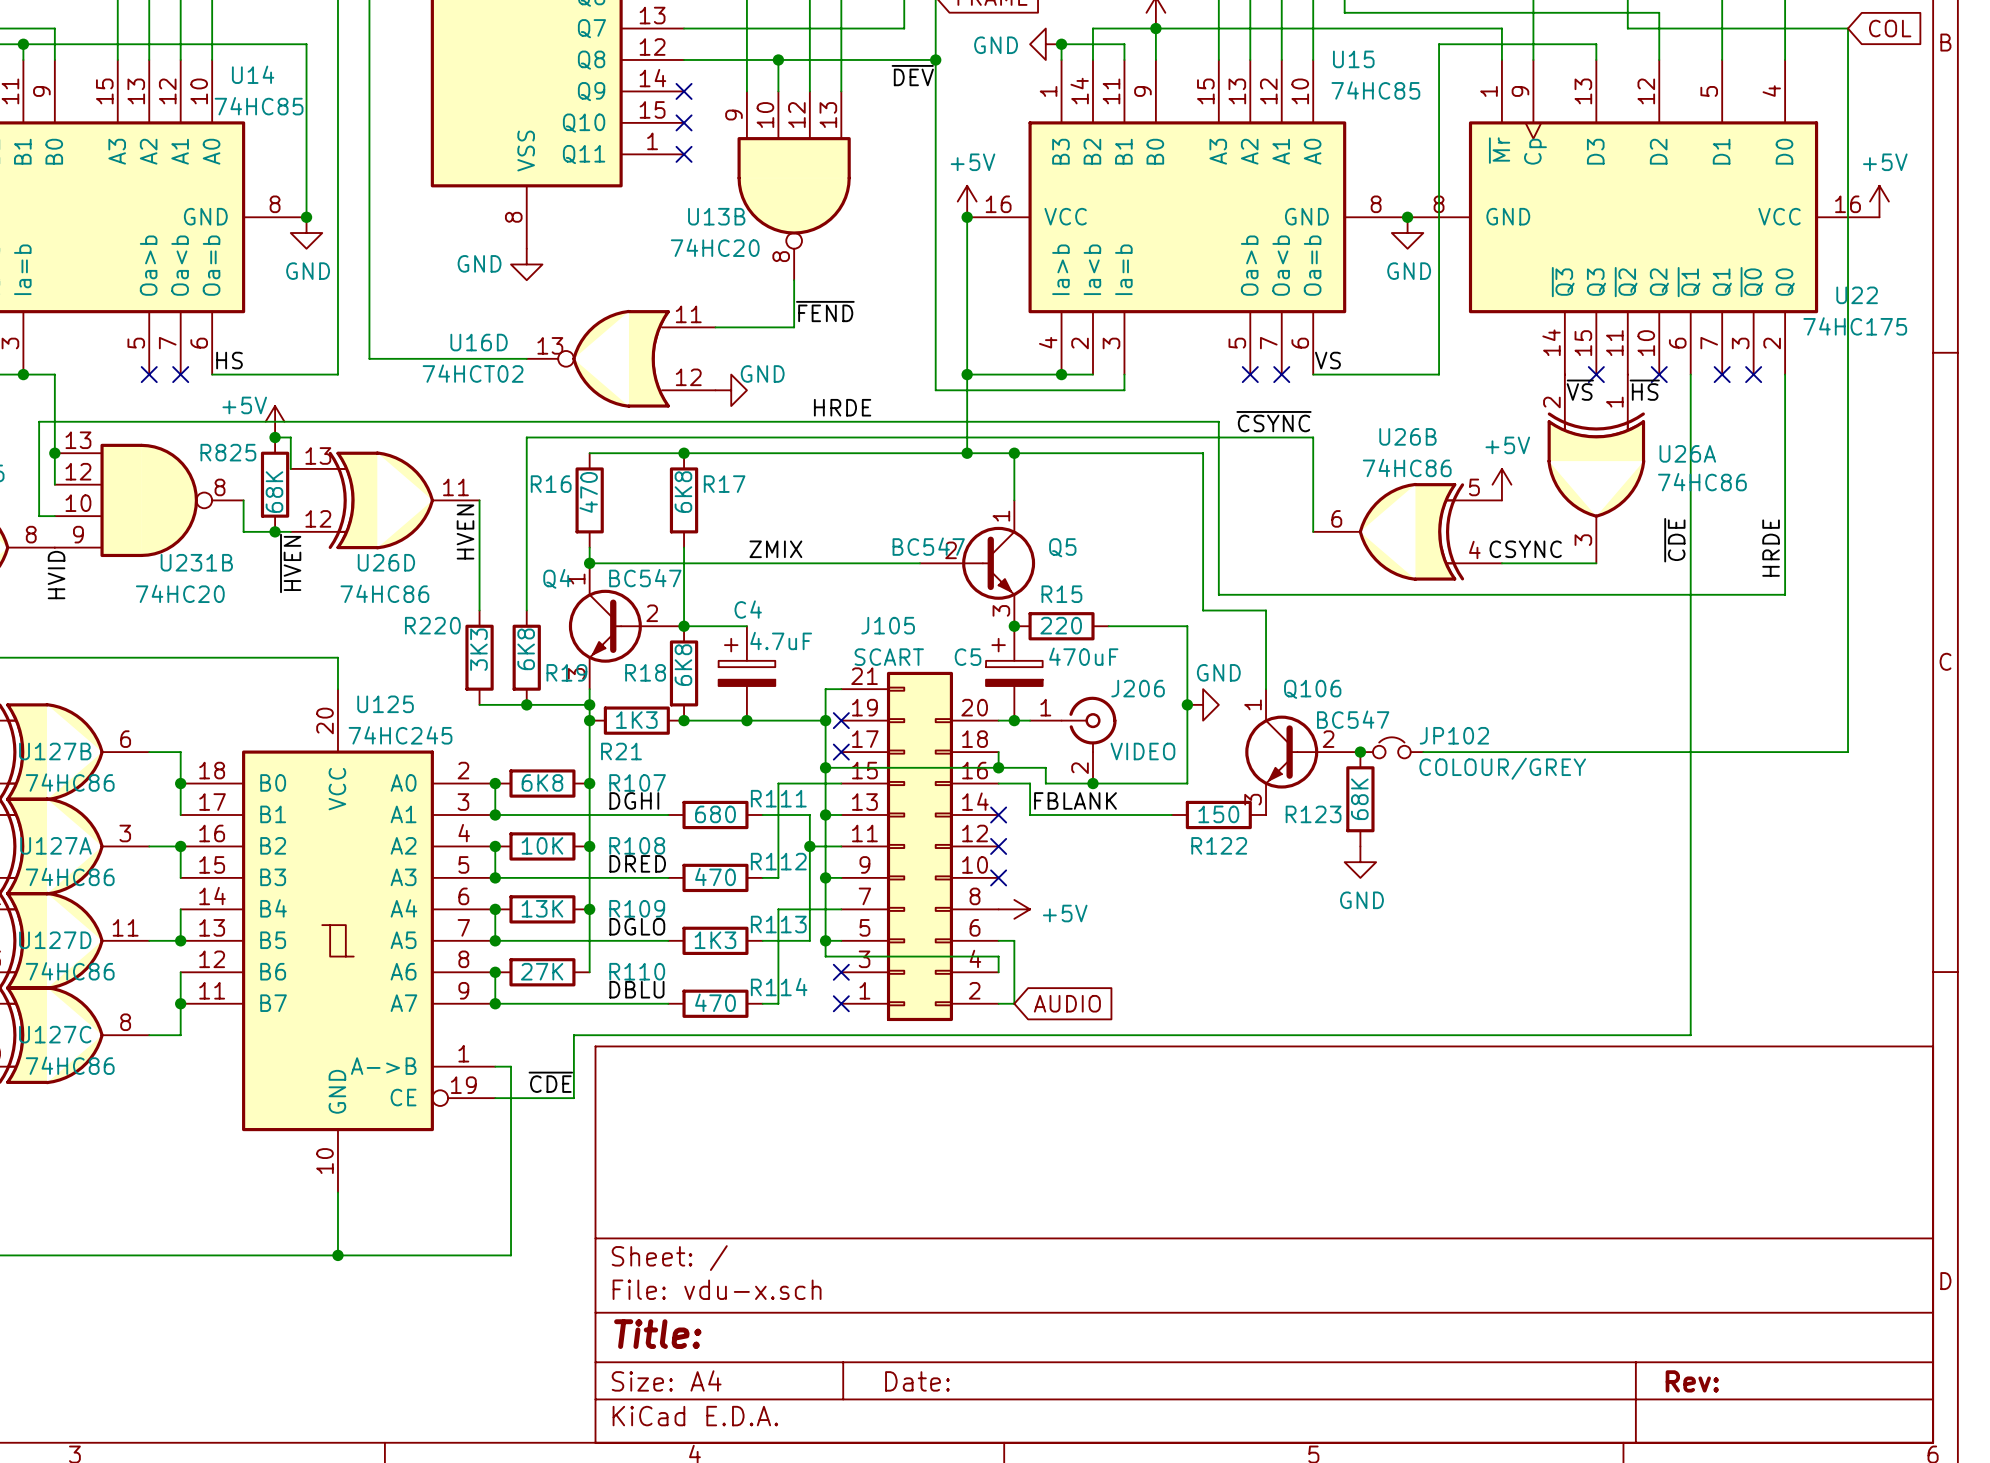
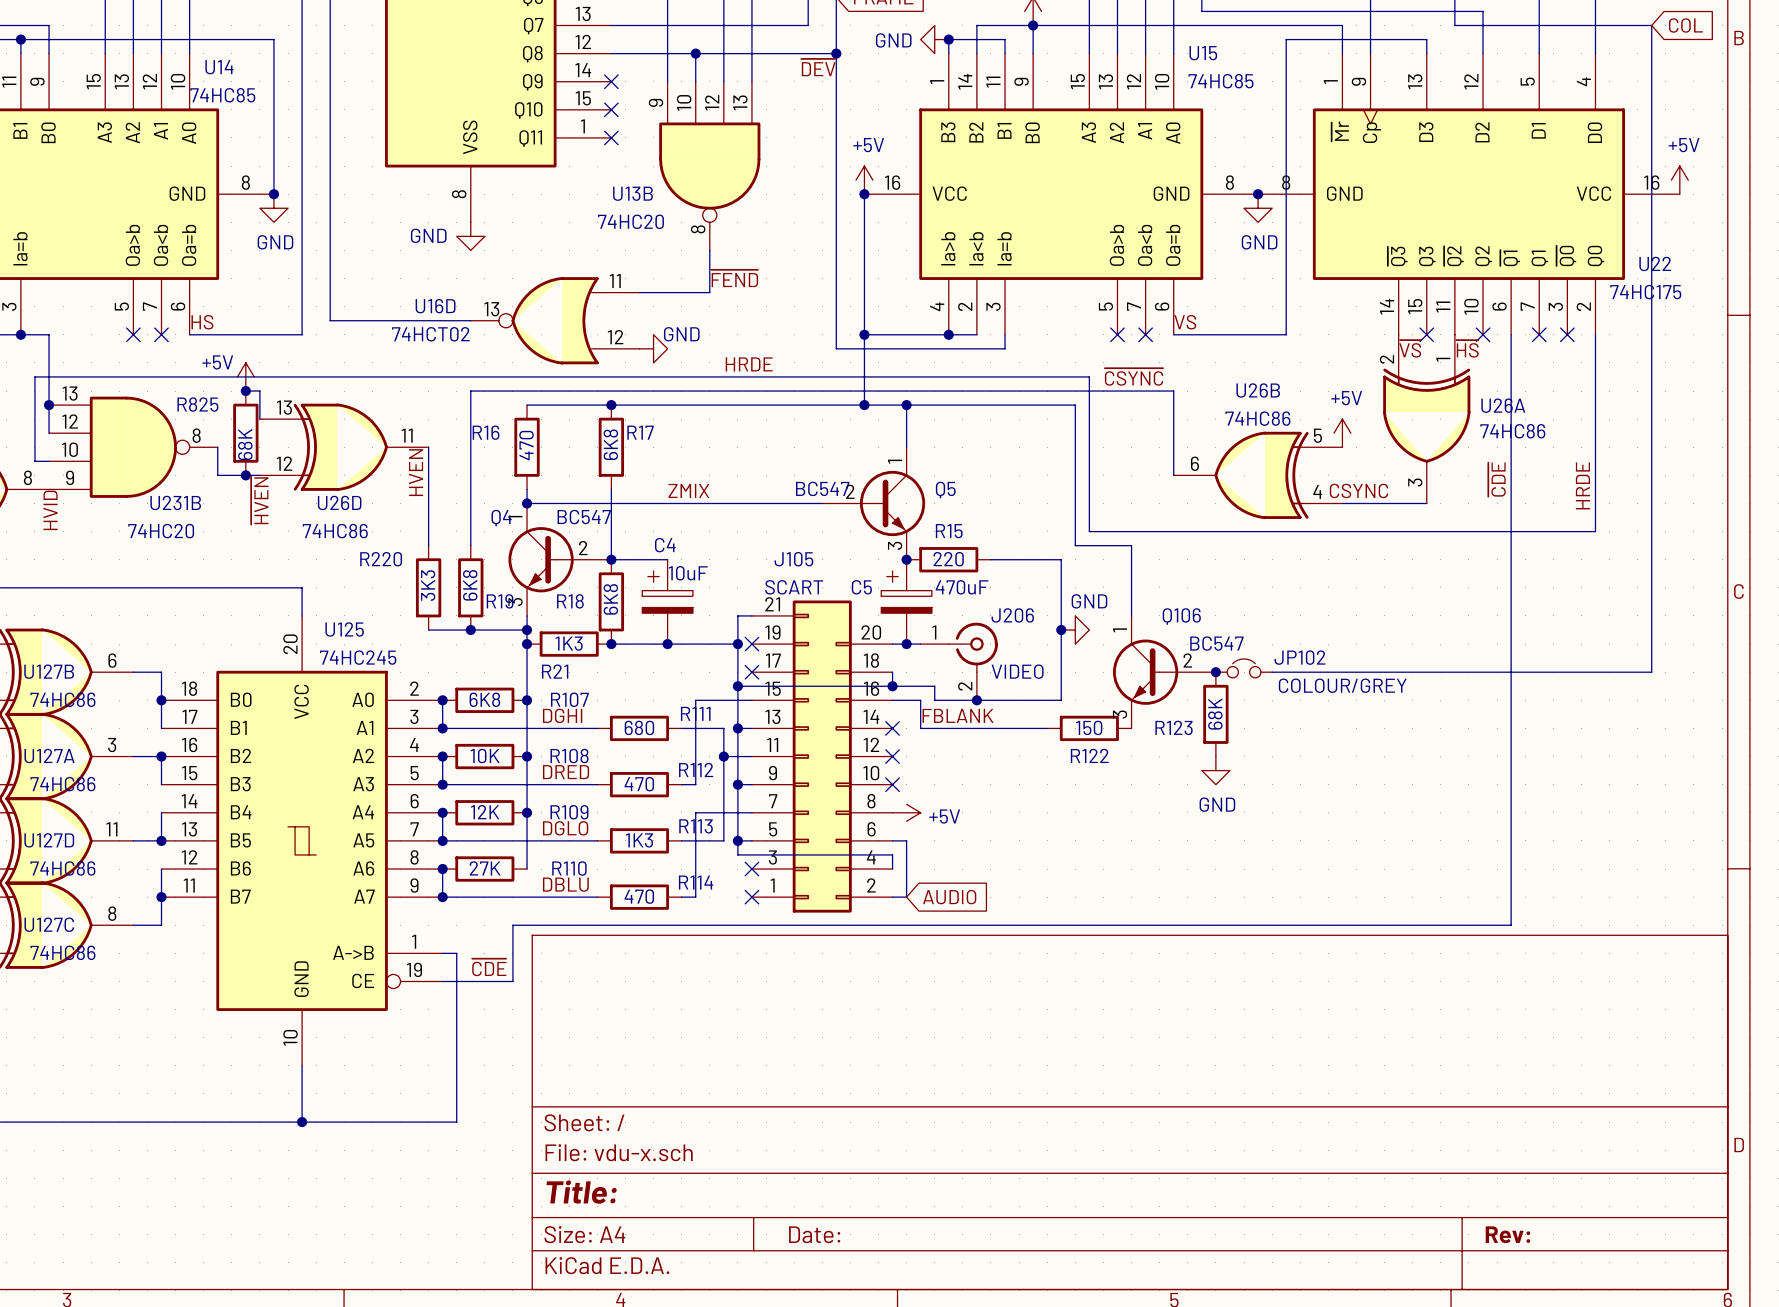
C4 value: 4.7uF (781, 641) -> 10uF (688, 573)
R109 value: 13K (542, 908) -> 12K (485, 812)

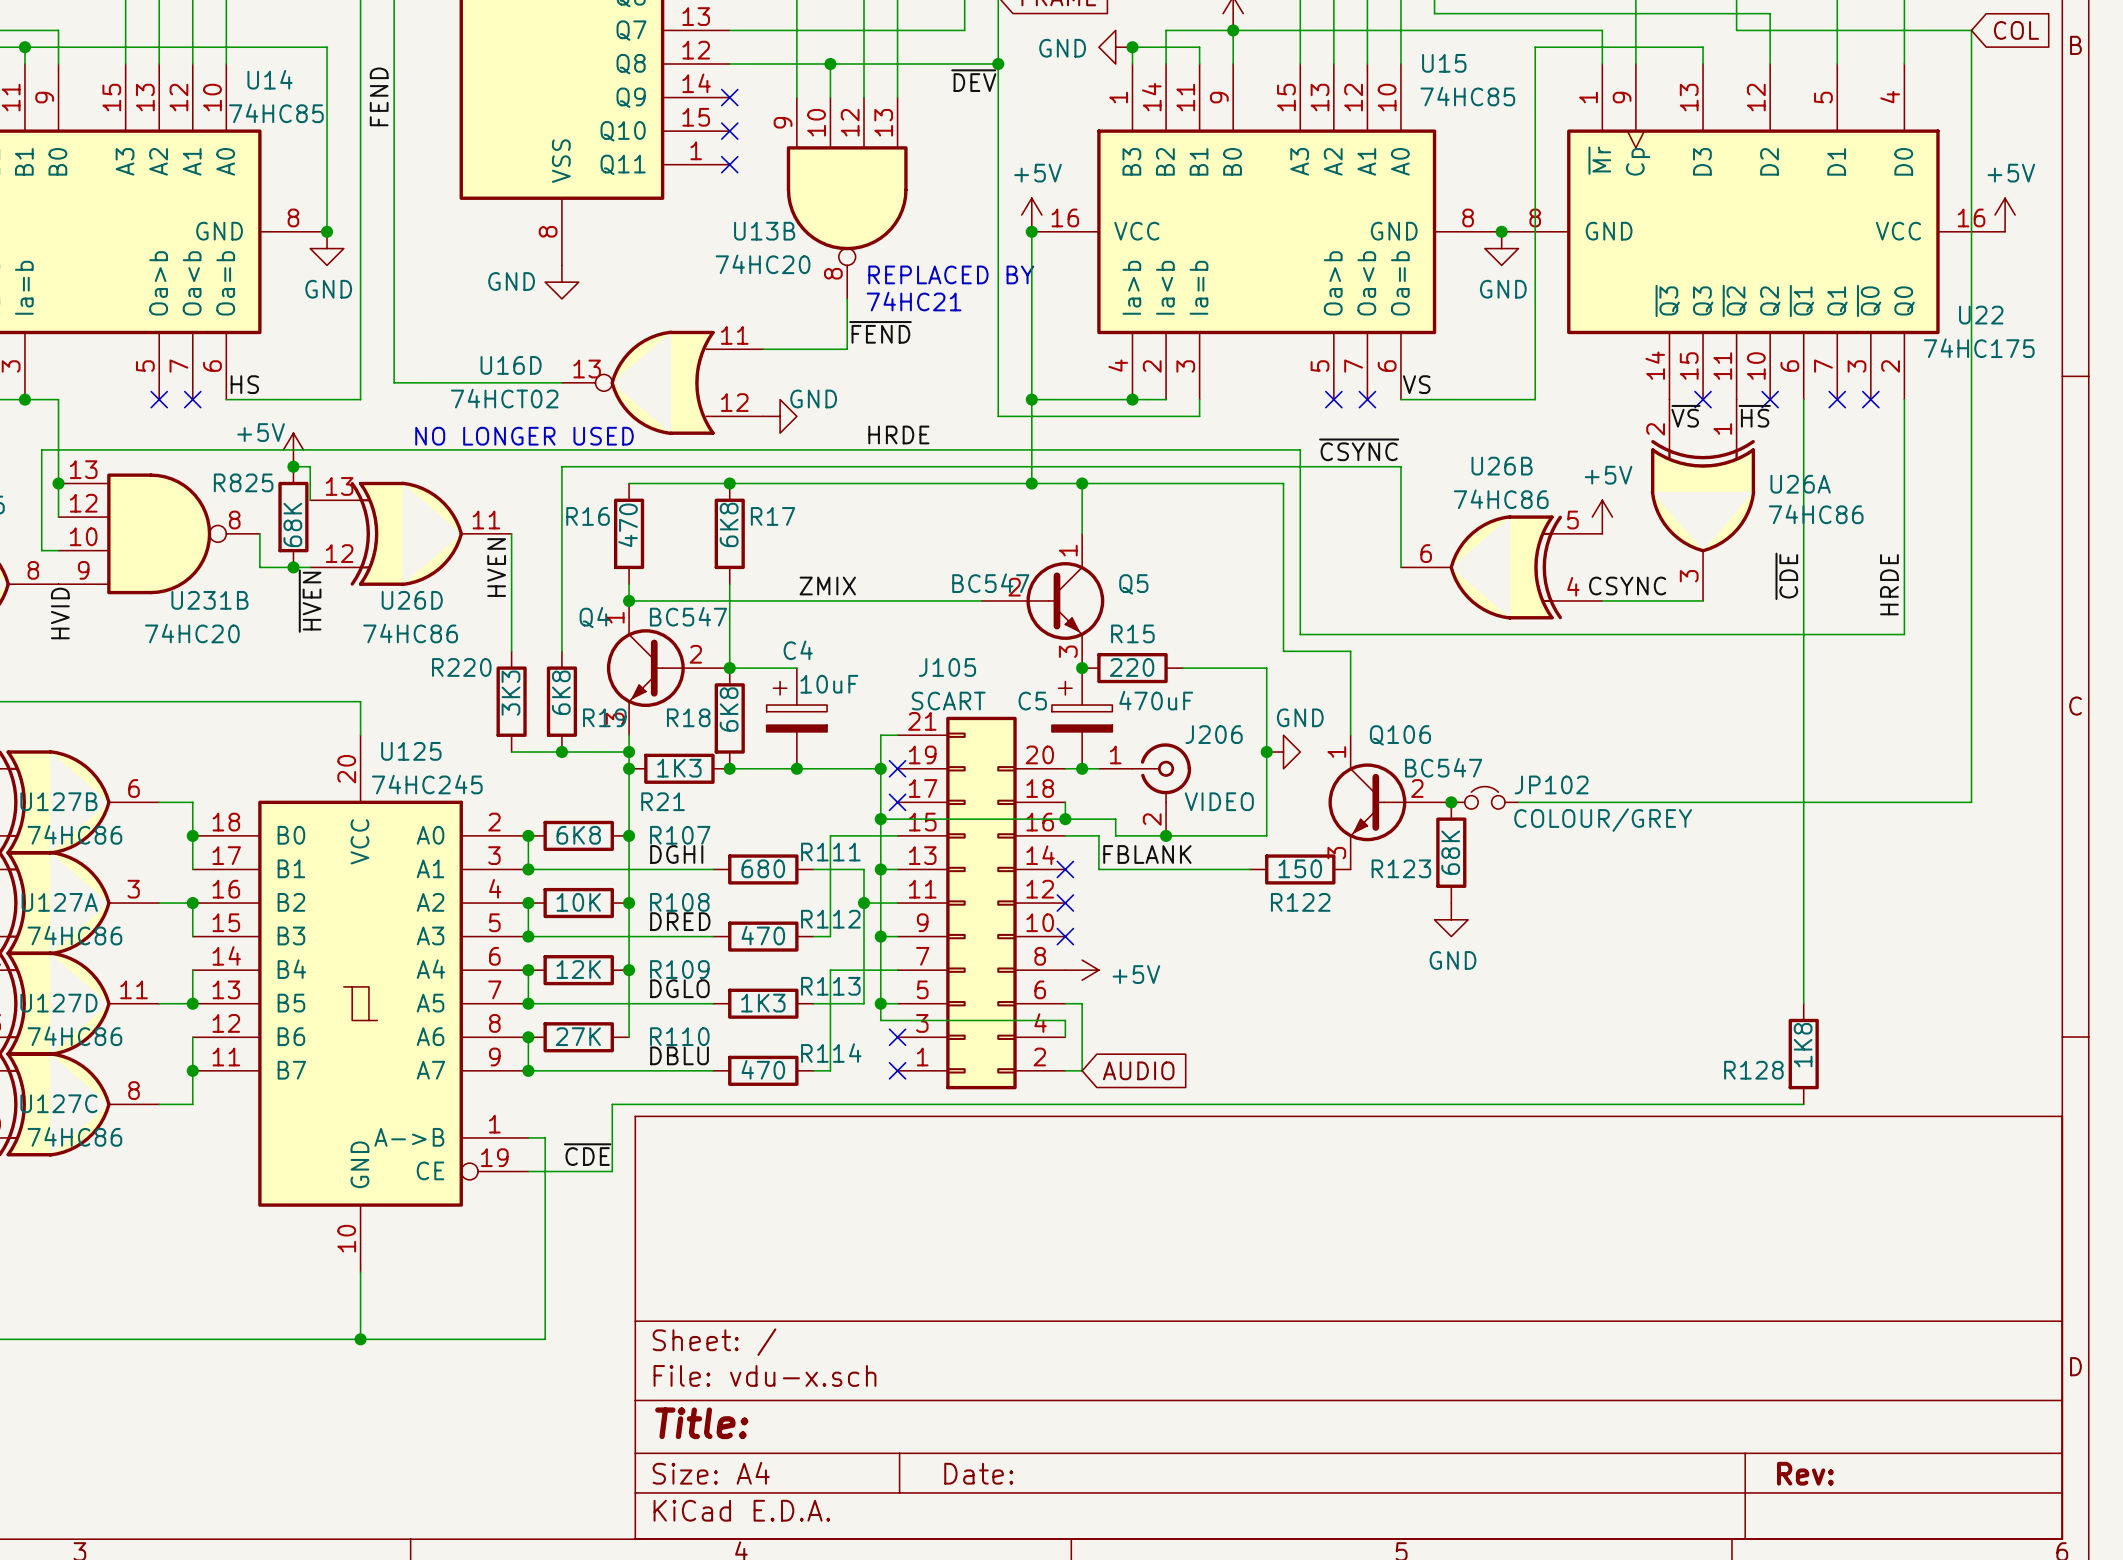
label: none -> FEND (379, 96)
text: none -> REPLACED BY (951, 274)
text: none -> 74HC21 (914, 301)
text: none -> NO LONGER USED (524, 436)
wire: (1511, 840) (1511, 925) -> none
R128: none -> 1K8 (1803, 1054)

